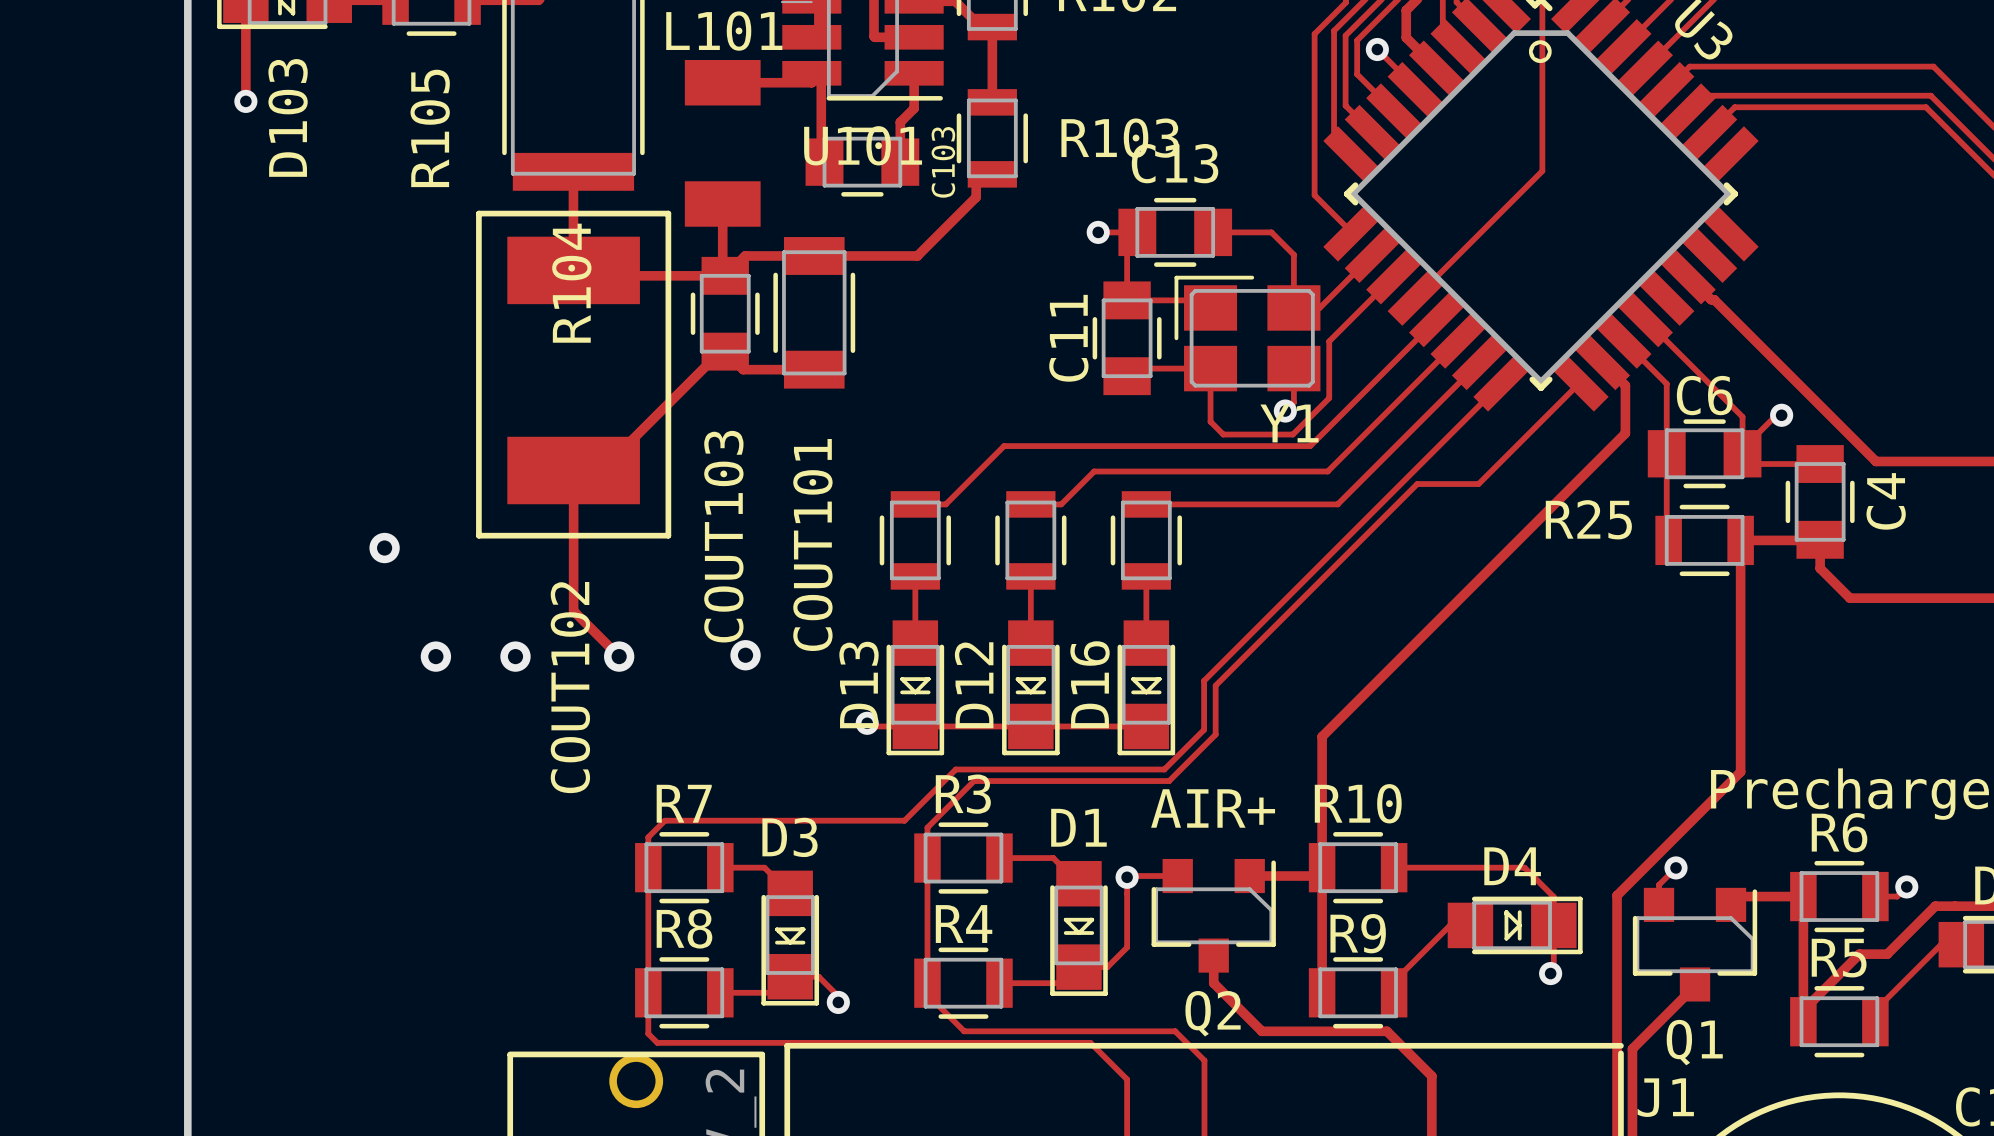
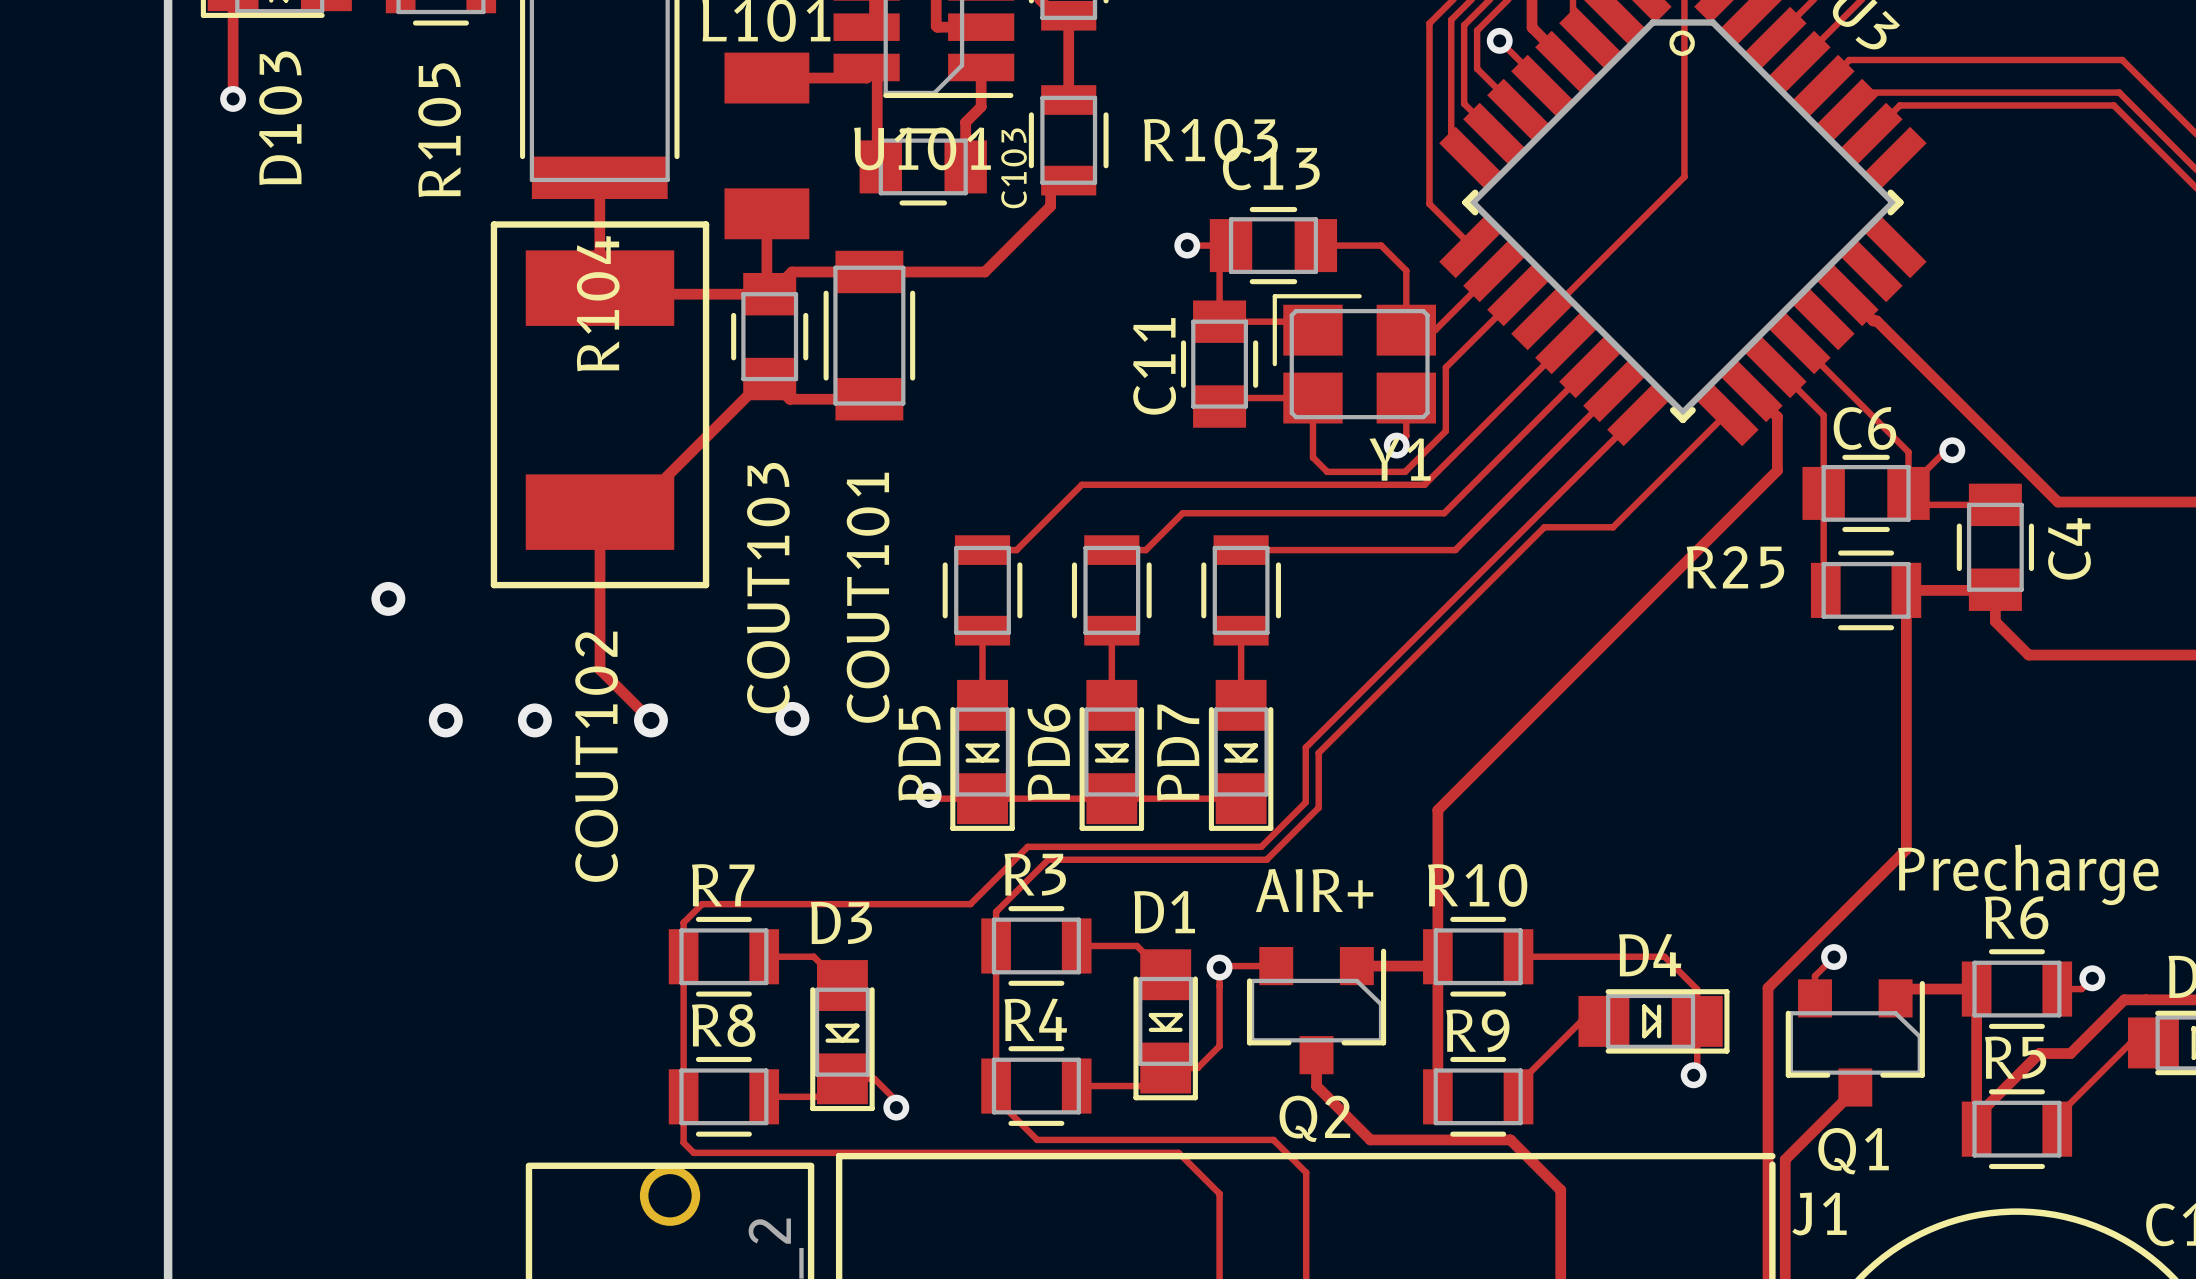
D16 name: D16 (1090, 684) -> PD7 (1178, 752)
D13 name: D13 (859, 685) -> PD5 (919, 753)
D12 name: D12 (974, 685) -> PD6 (1049, 752)

